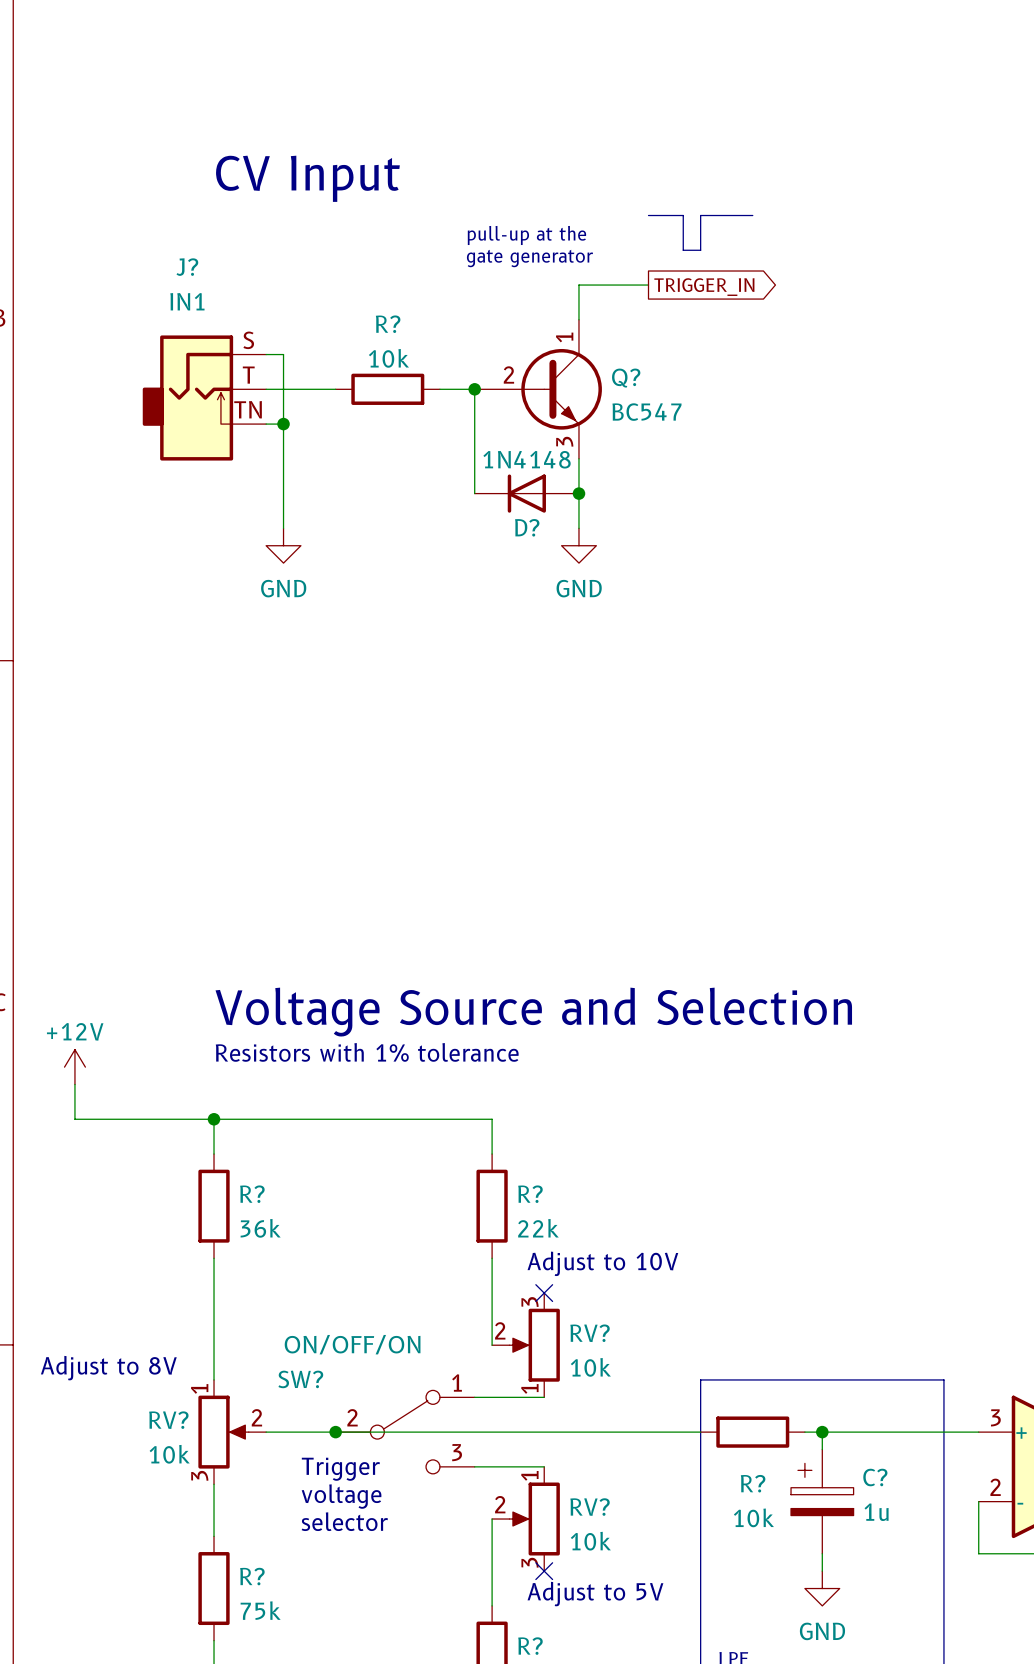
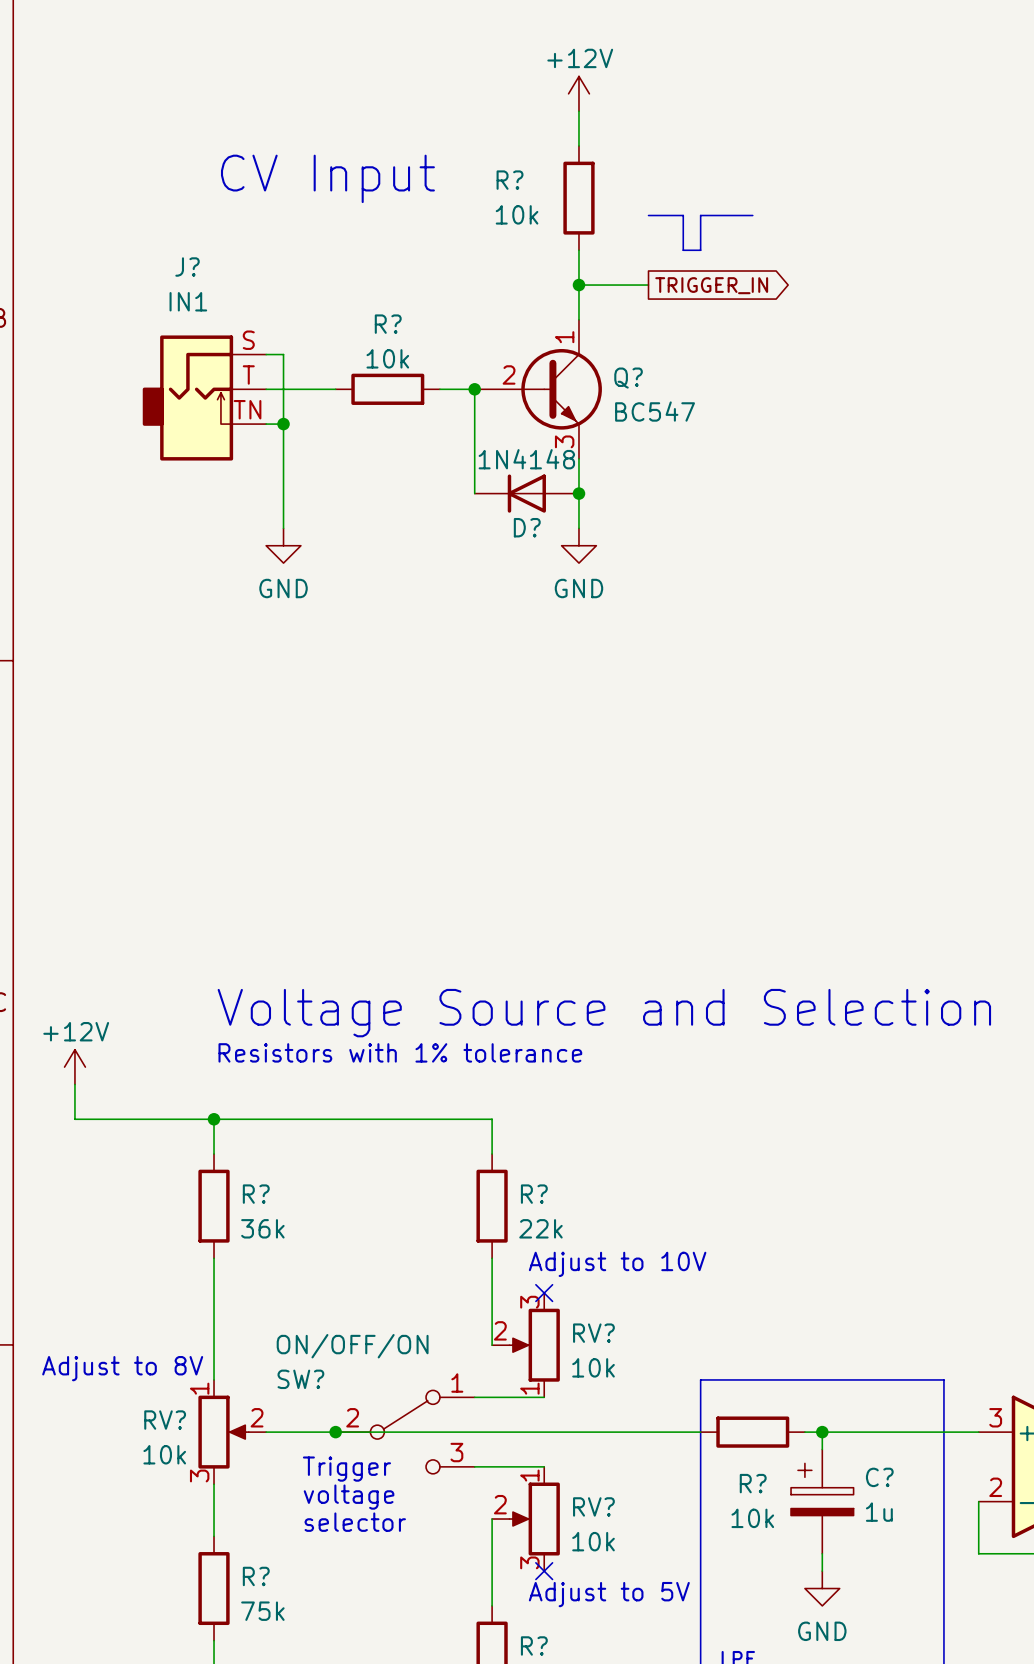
power symbol: none -> +12V (578, 93)
wire: none -> (578, 111) (578, 145)
R?: none -> 10k (578, 198)
text: pull-up at the (526, 235) -> none
wire: none -> (578, 250) (578, 285)
text: gate generator (529, 258) -> none
junction: none -> (578, 285)

